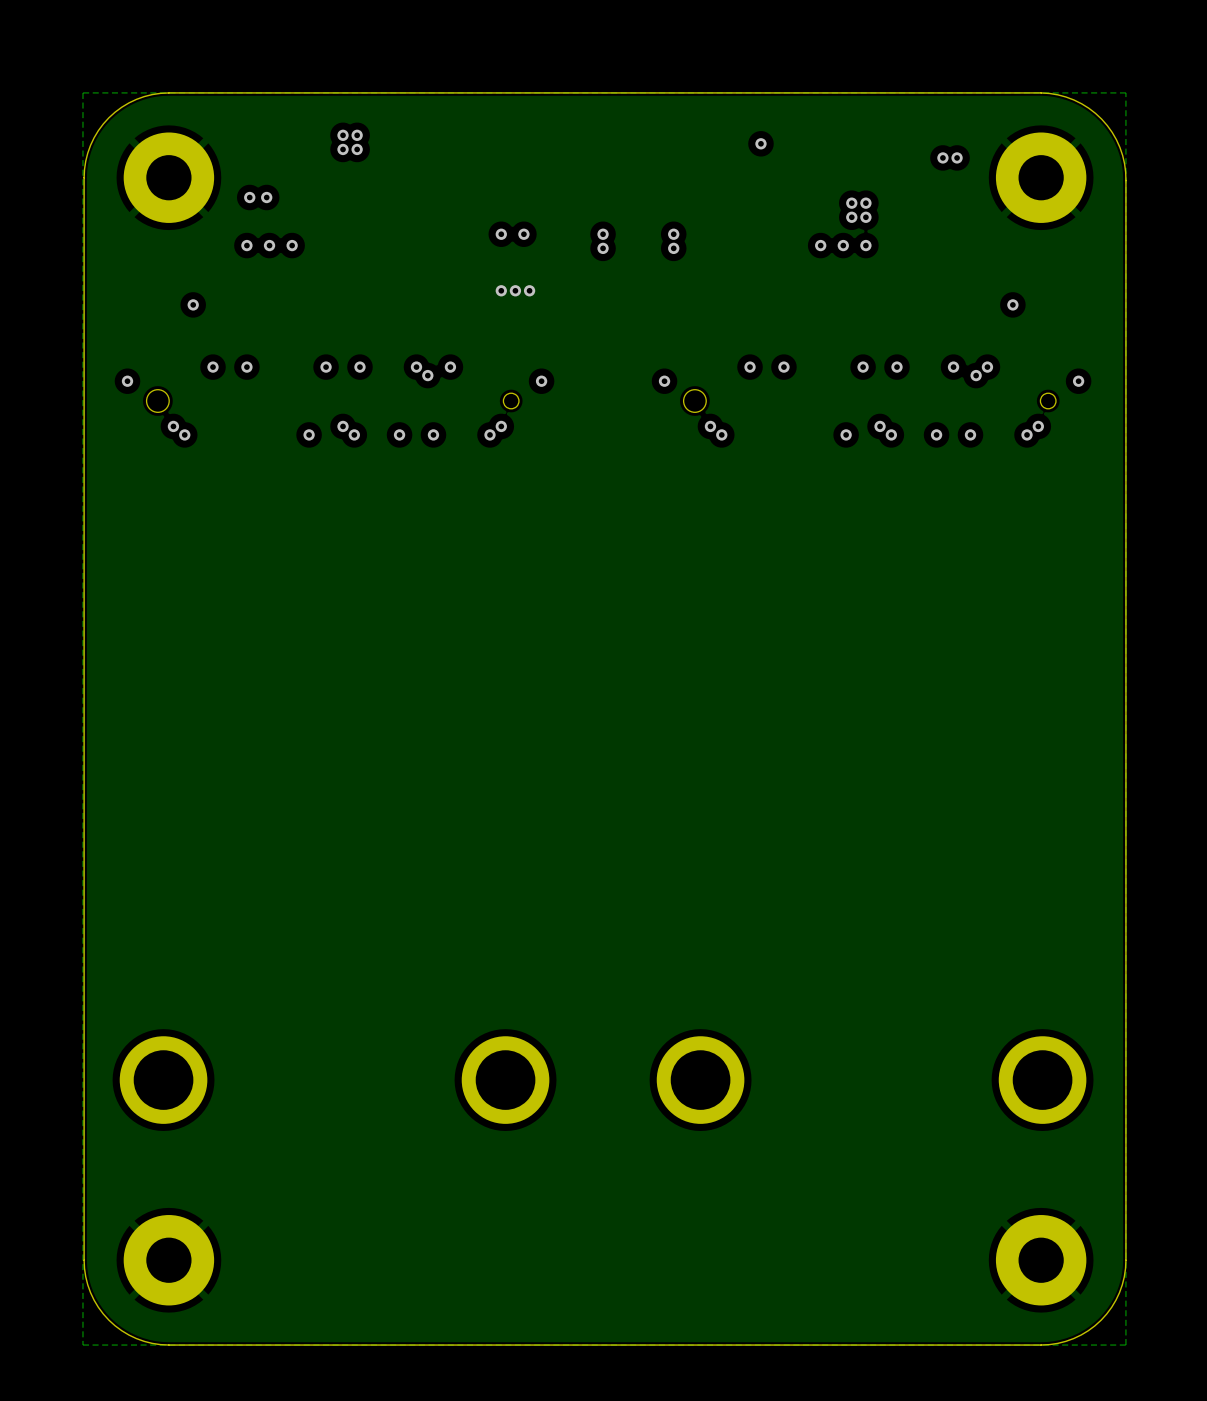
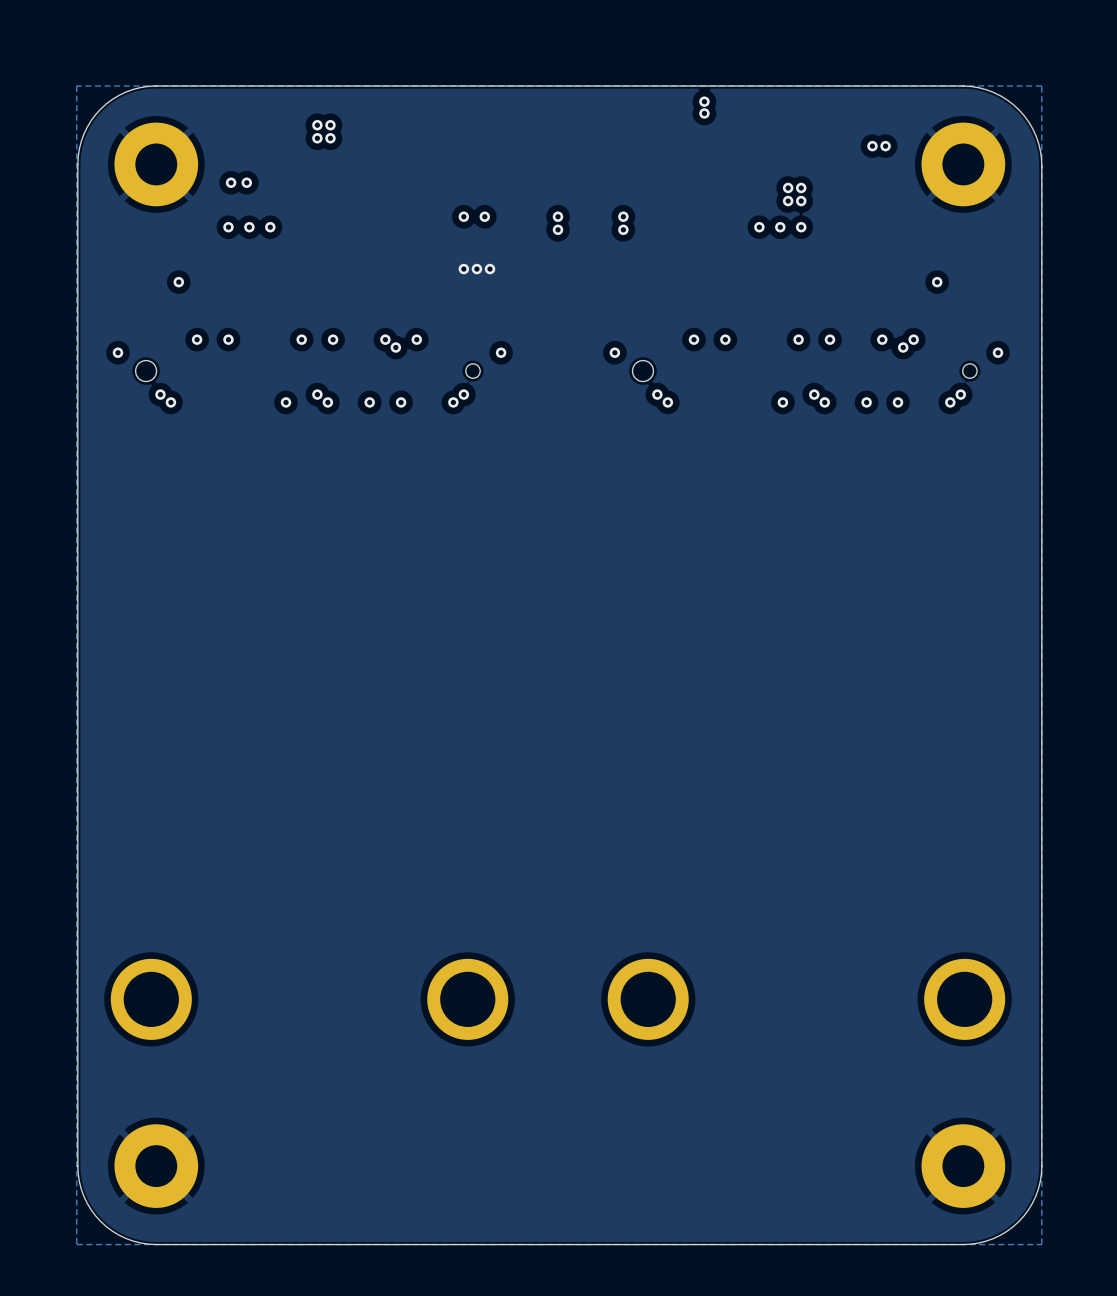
via: none -> (704, 101)
via: none -> (704, 113)
via: (760, 143) -> none

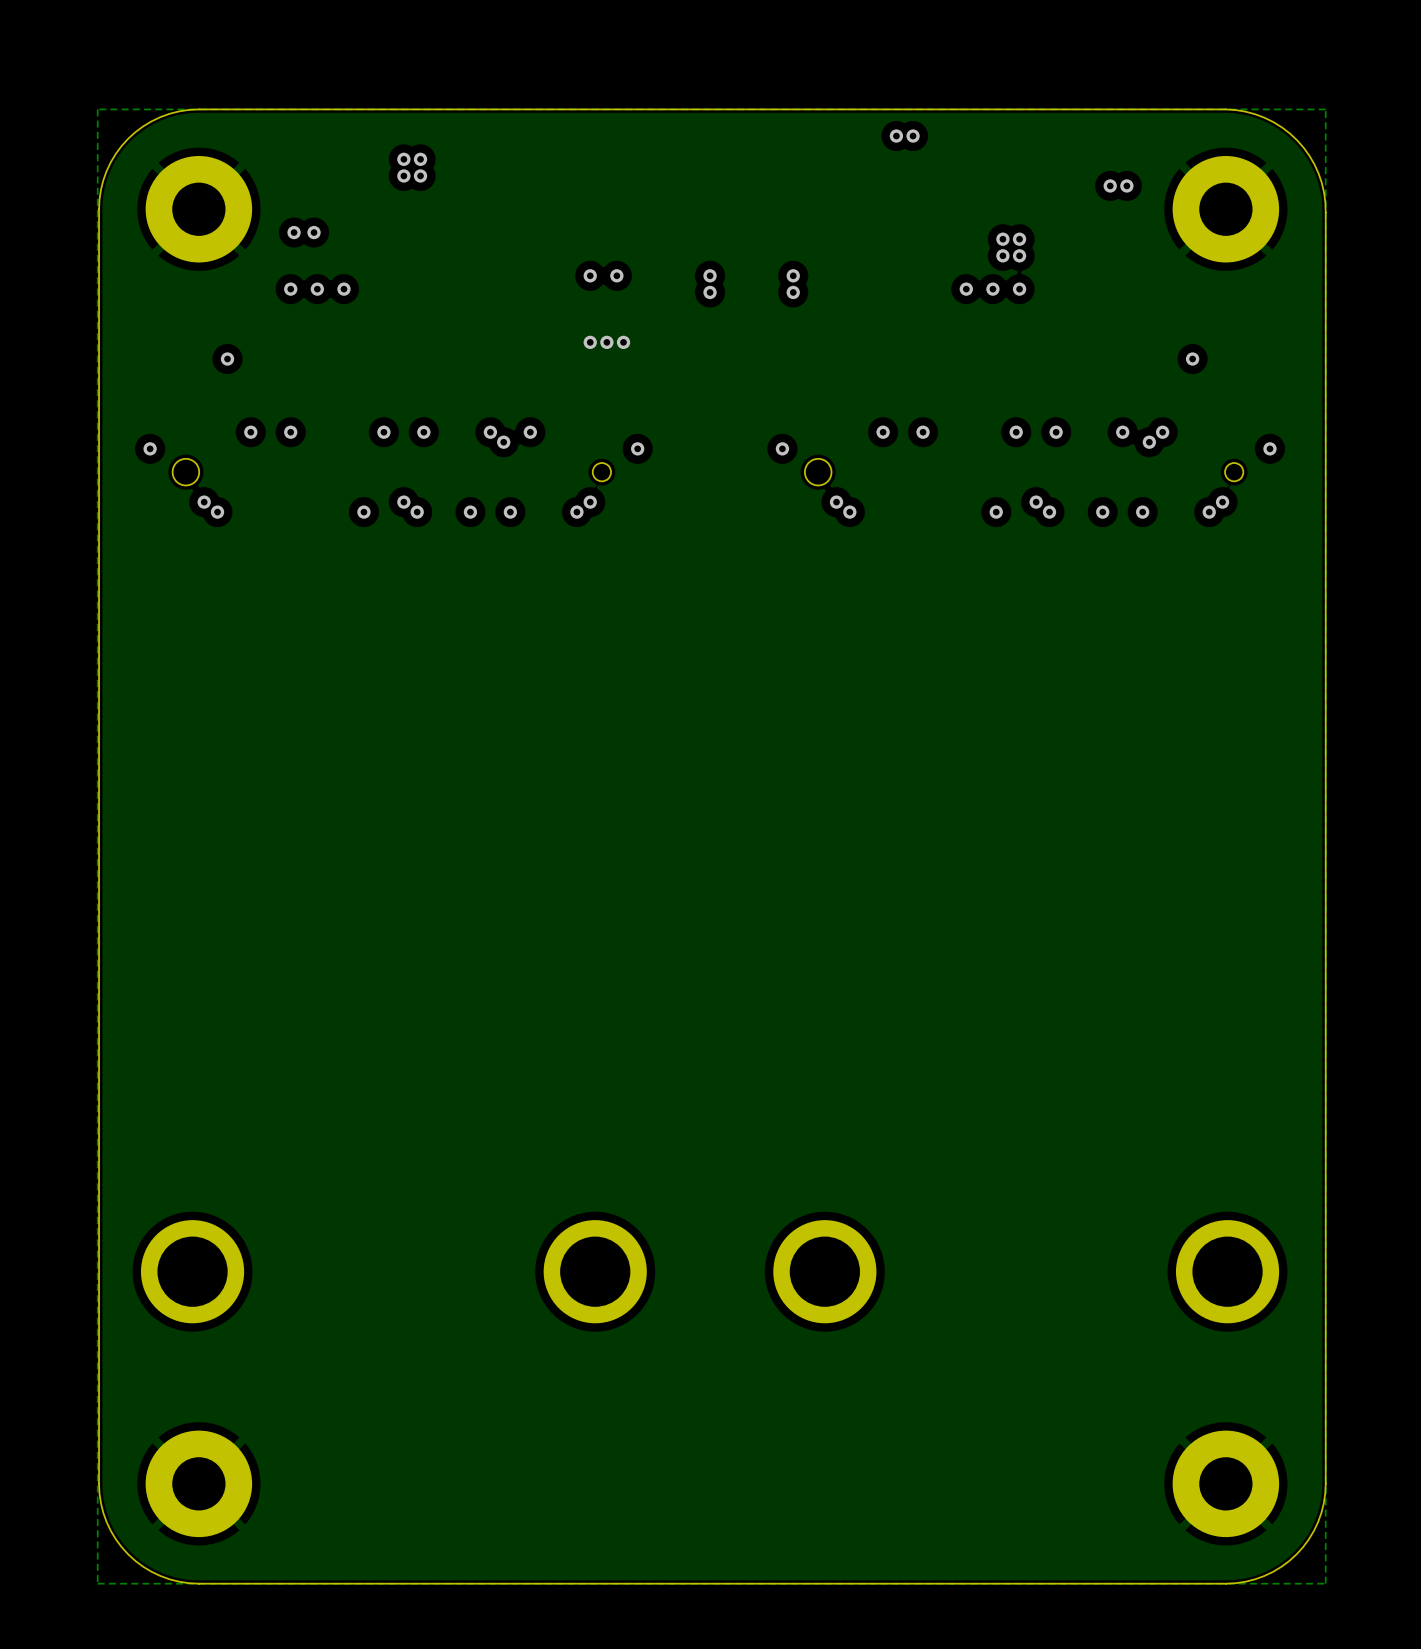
via: (704, 101) -> none
via: none -> (896, 136)
via: none -> (913, 136)
via: (704, 113) -> none

